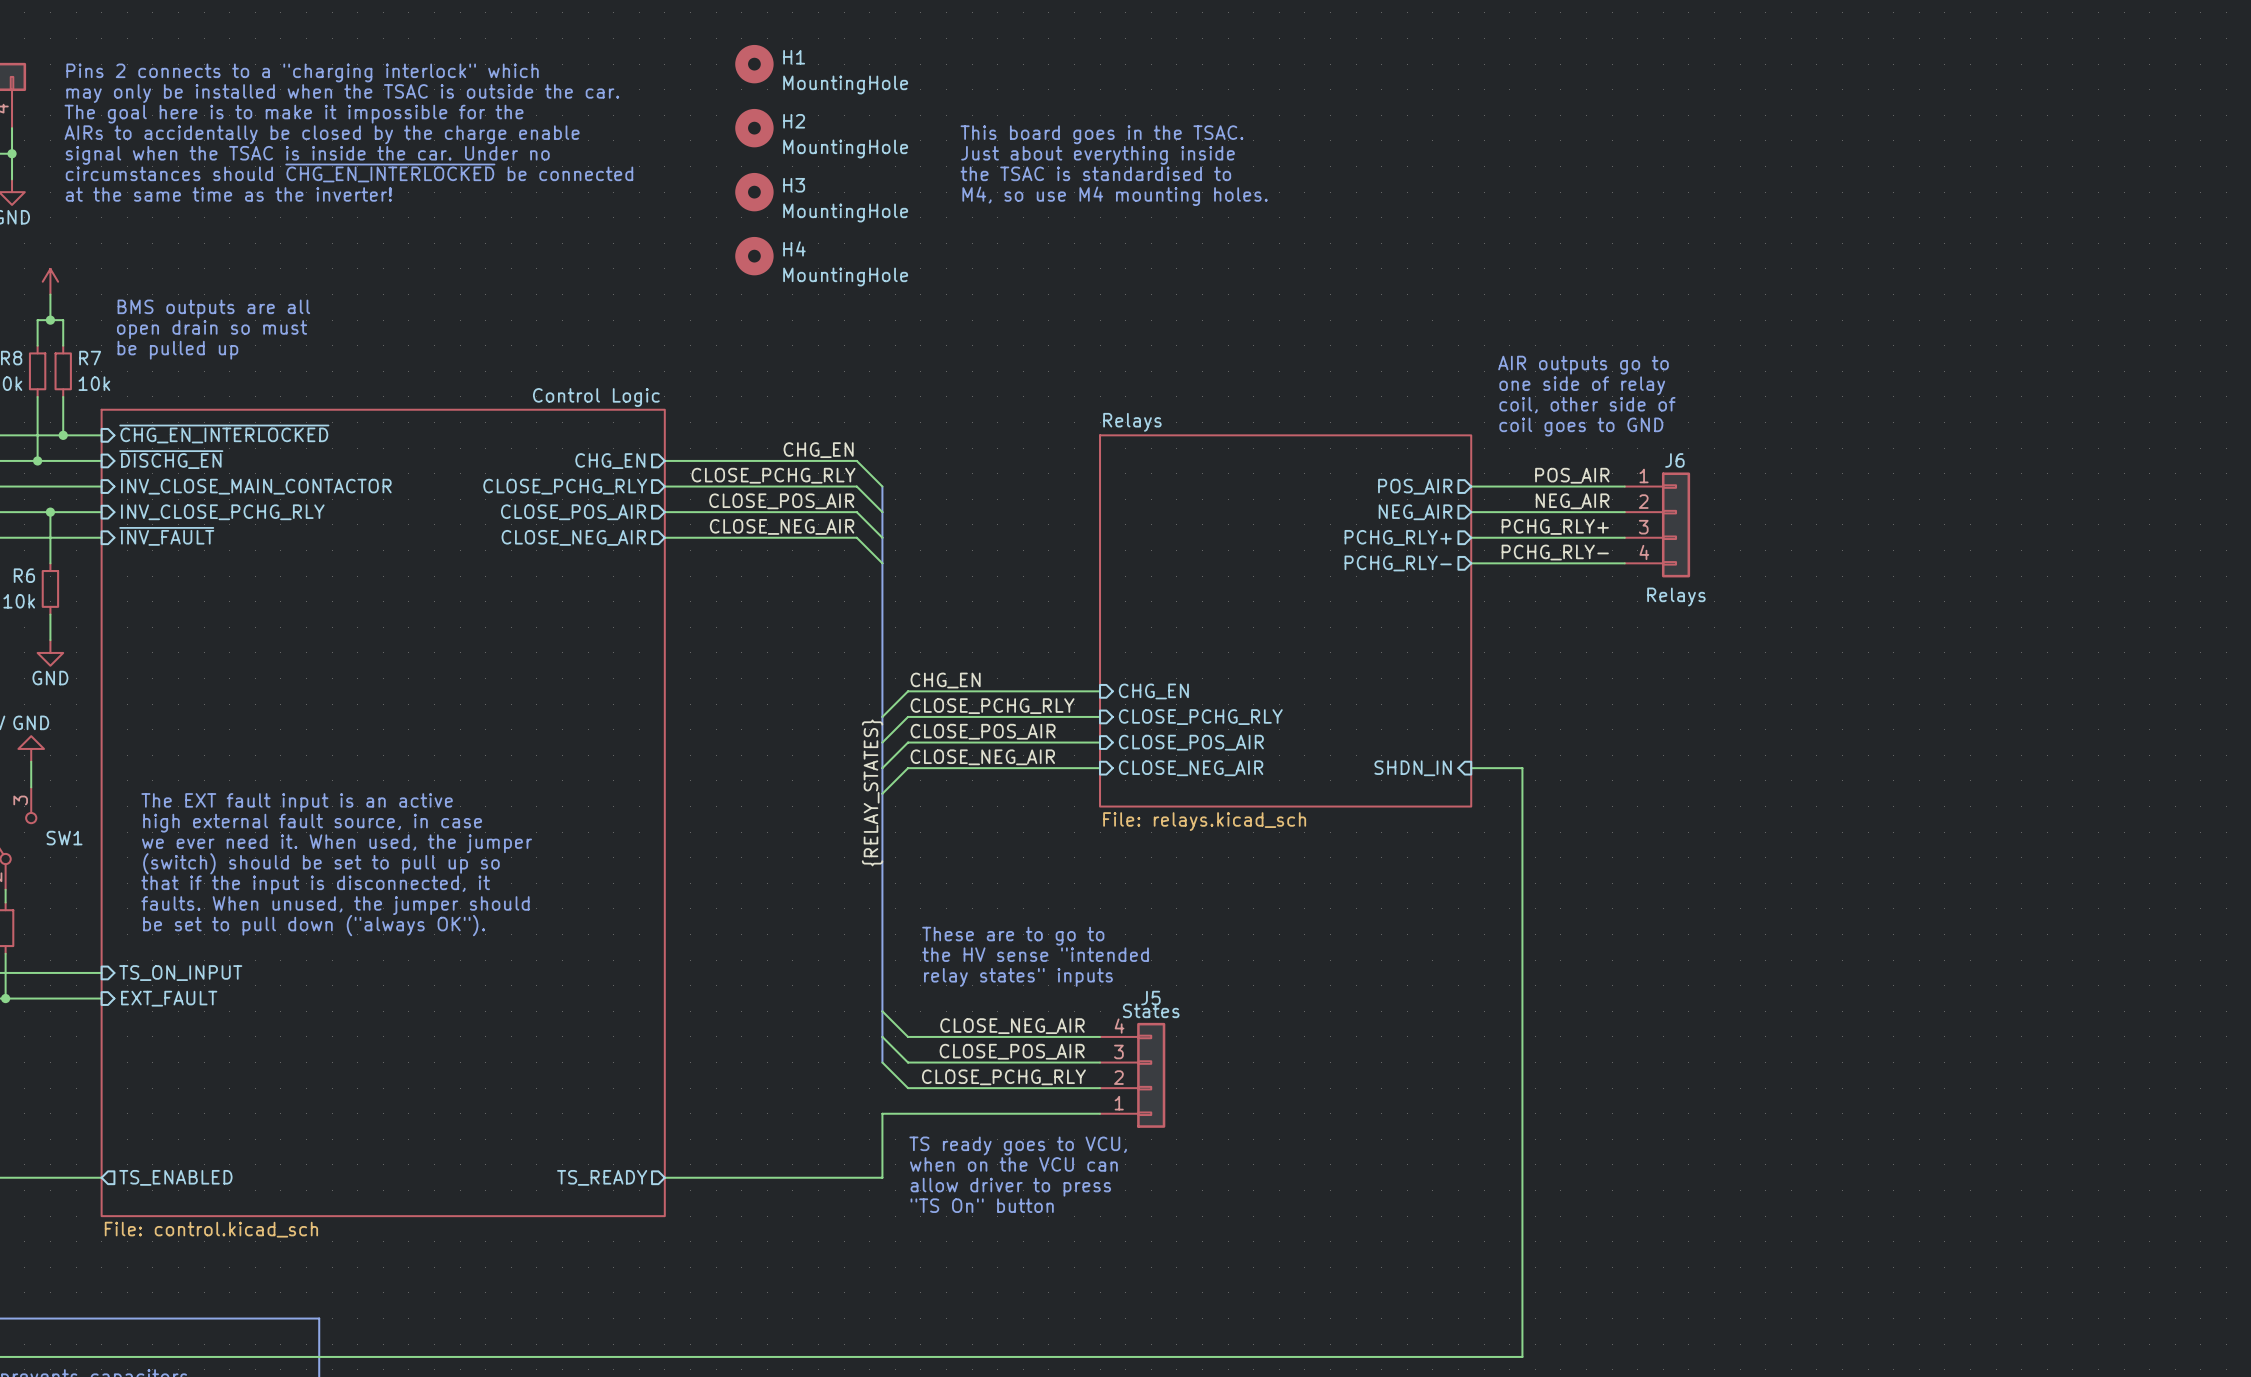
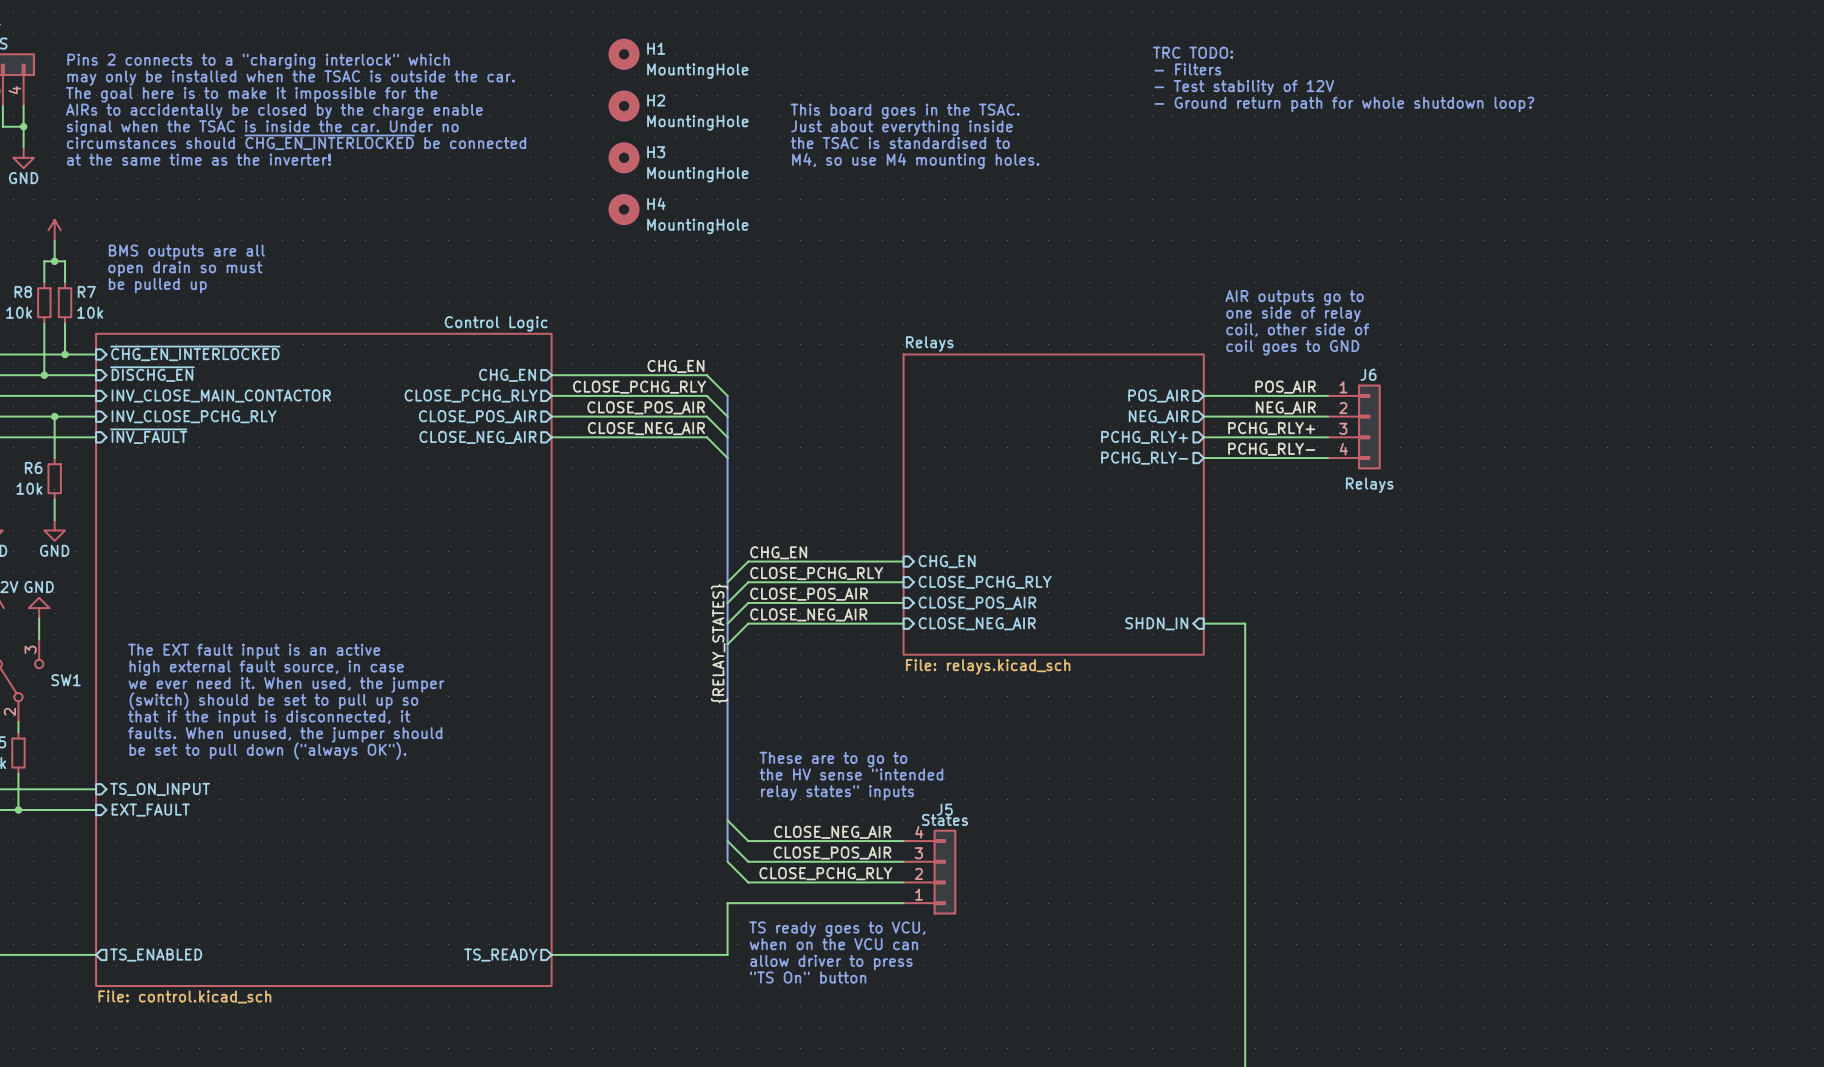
text: none -> TRC TODO: (1193, 52)
text: none -> - Filters (1187, 69)
text: none -> - Test stability of 12V (1244, 87)
text: none -> - Ground return path for whole shutdown loop? (1344, 104)

